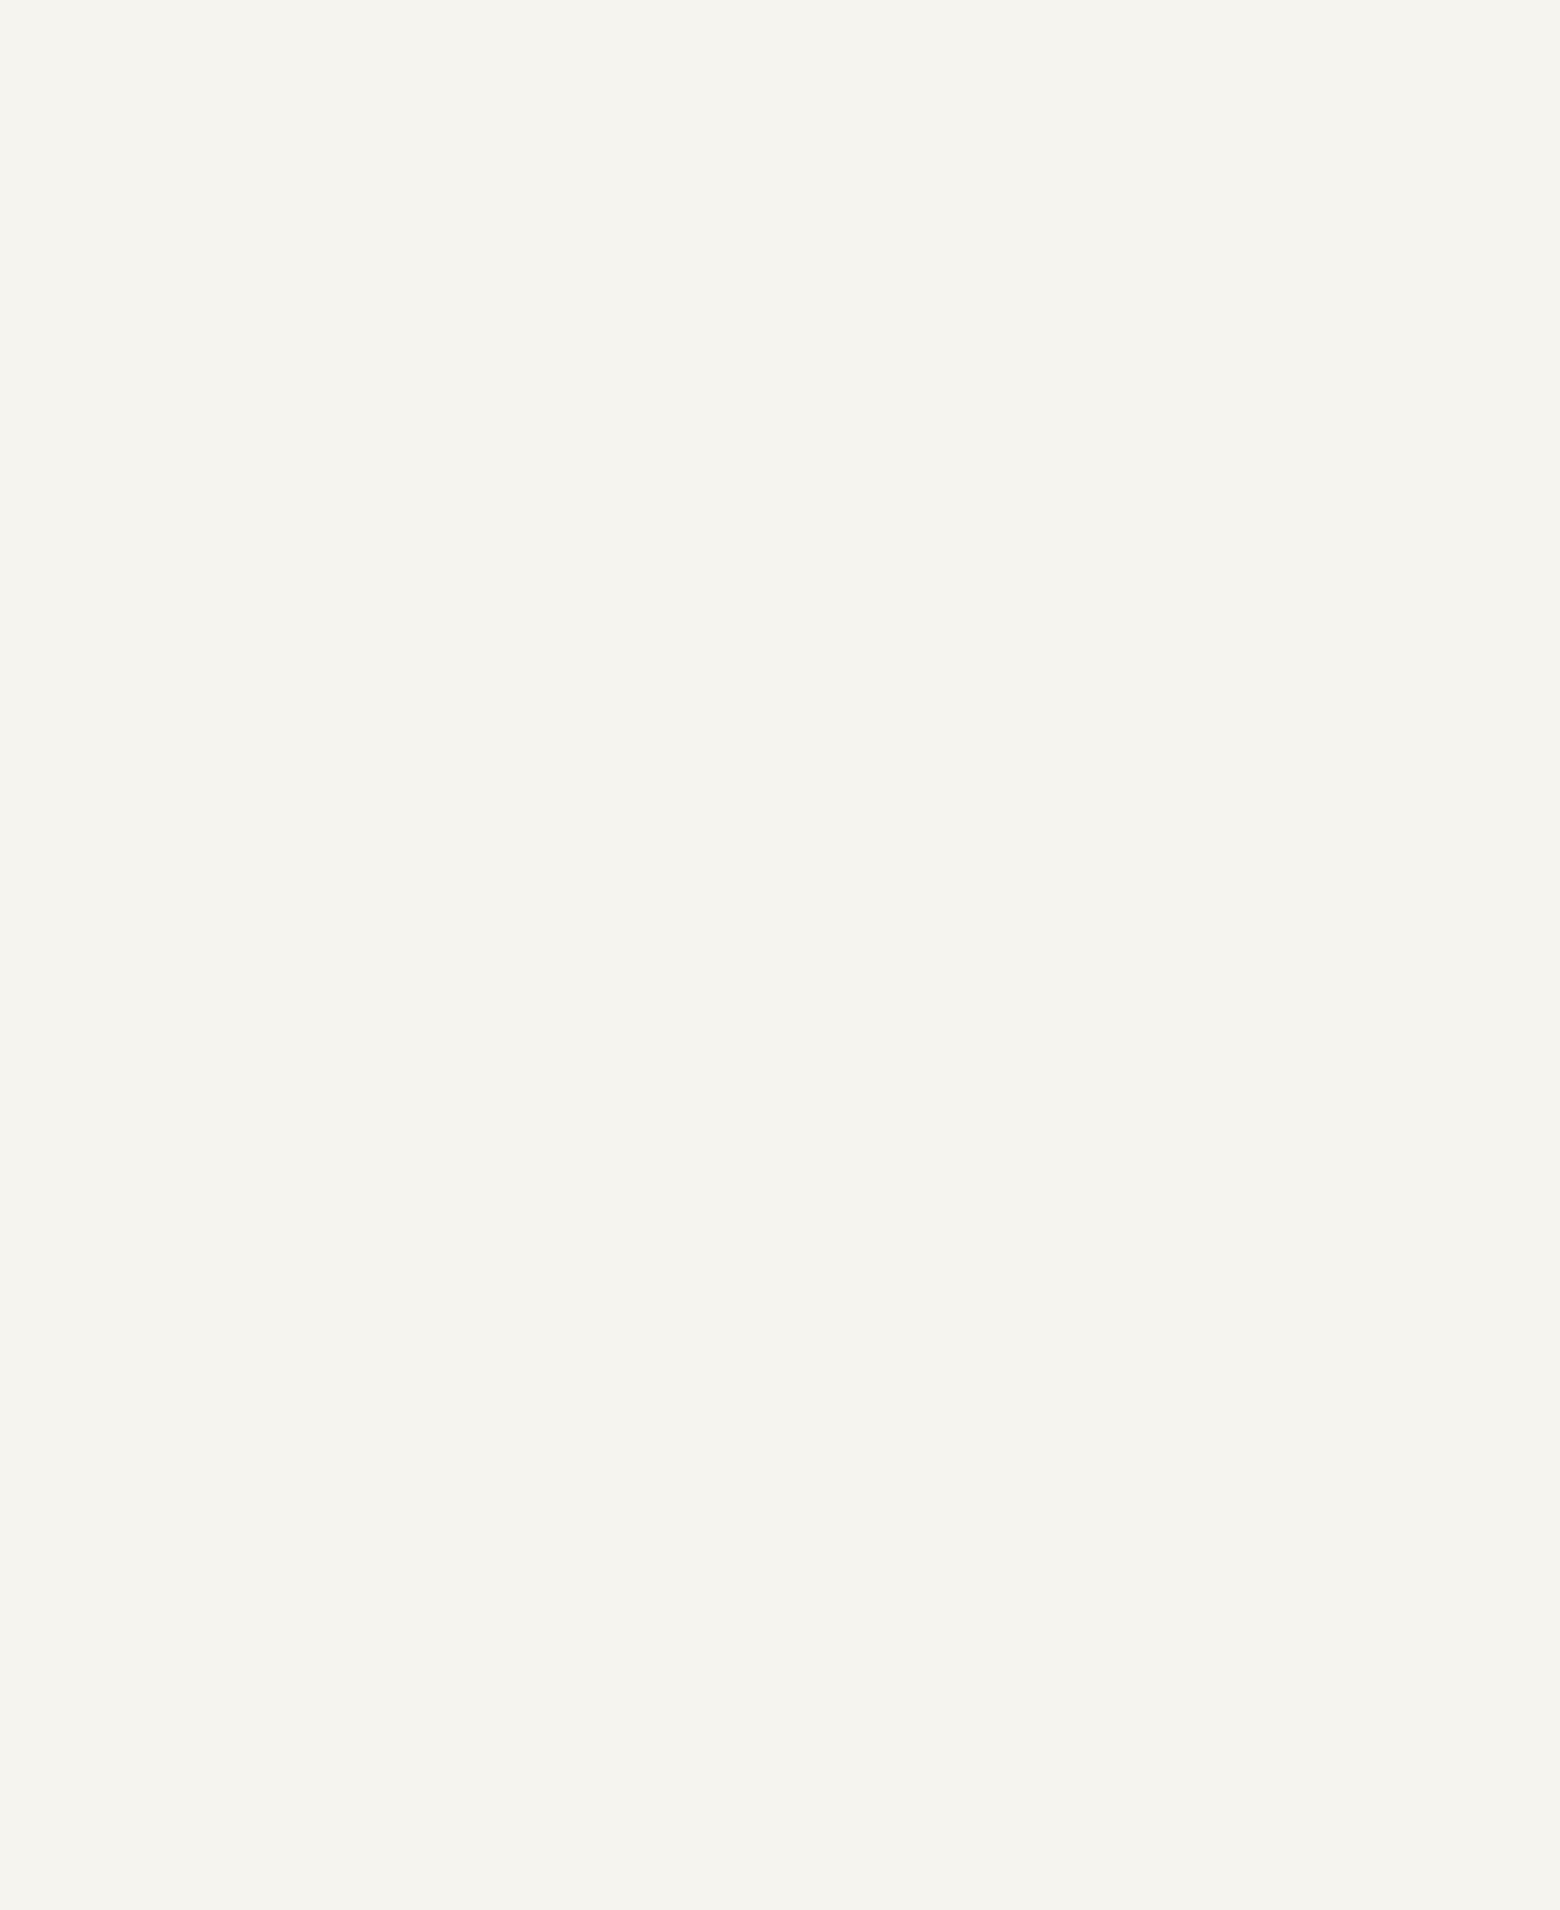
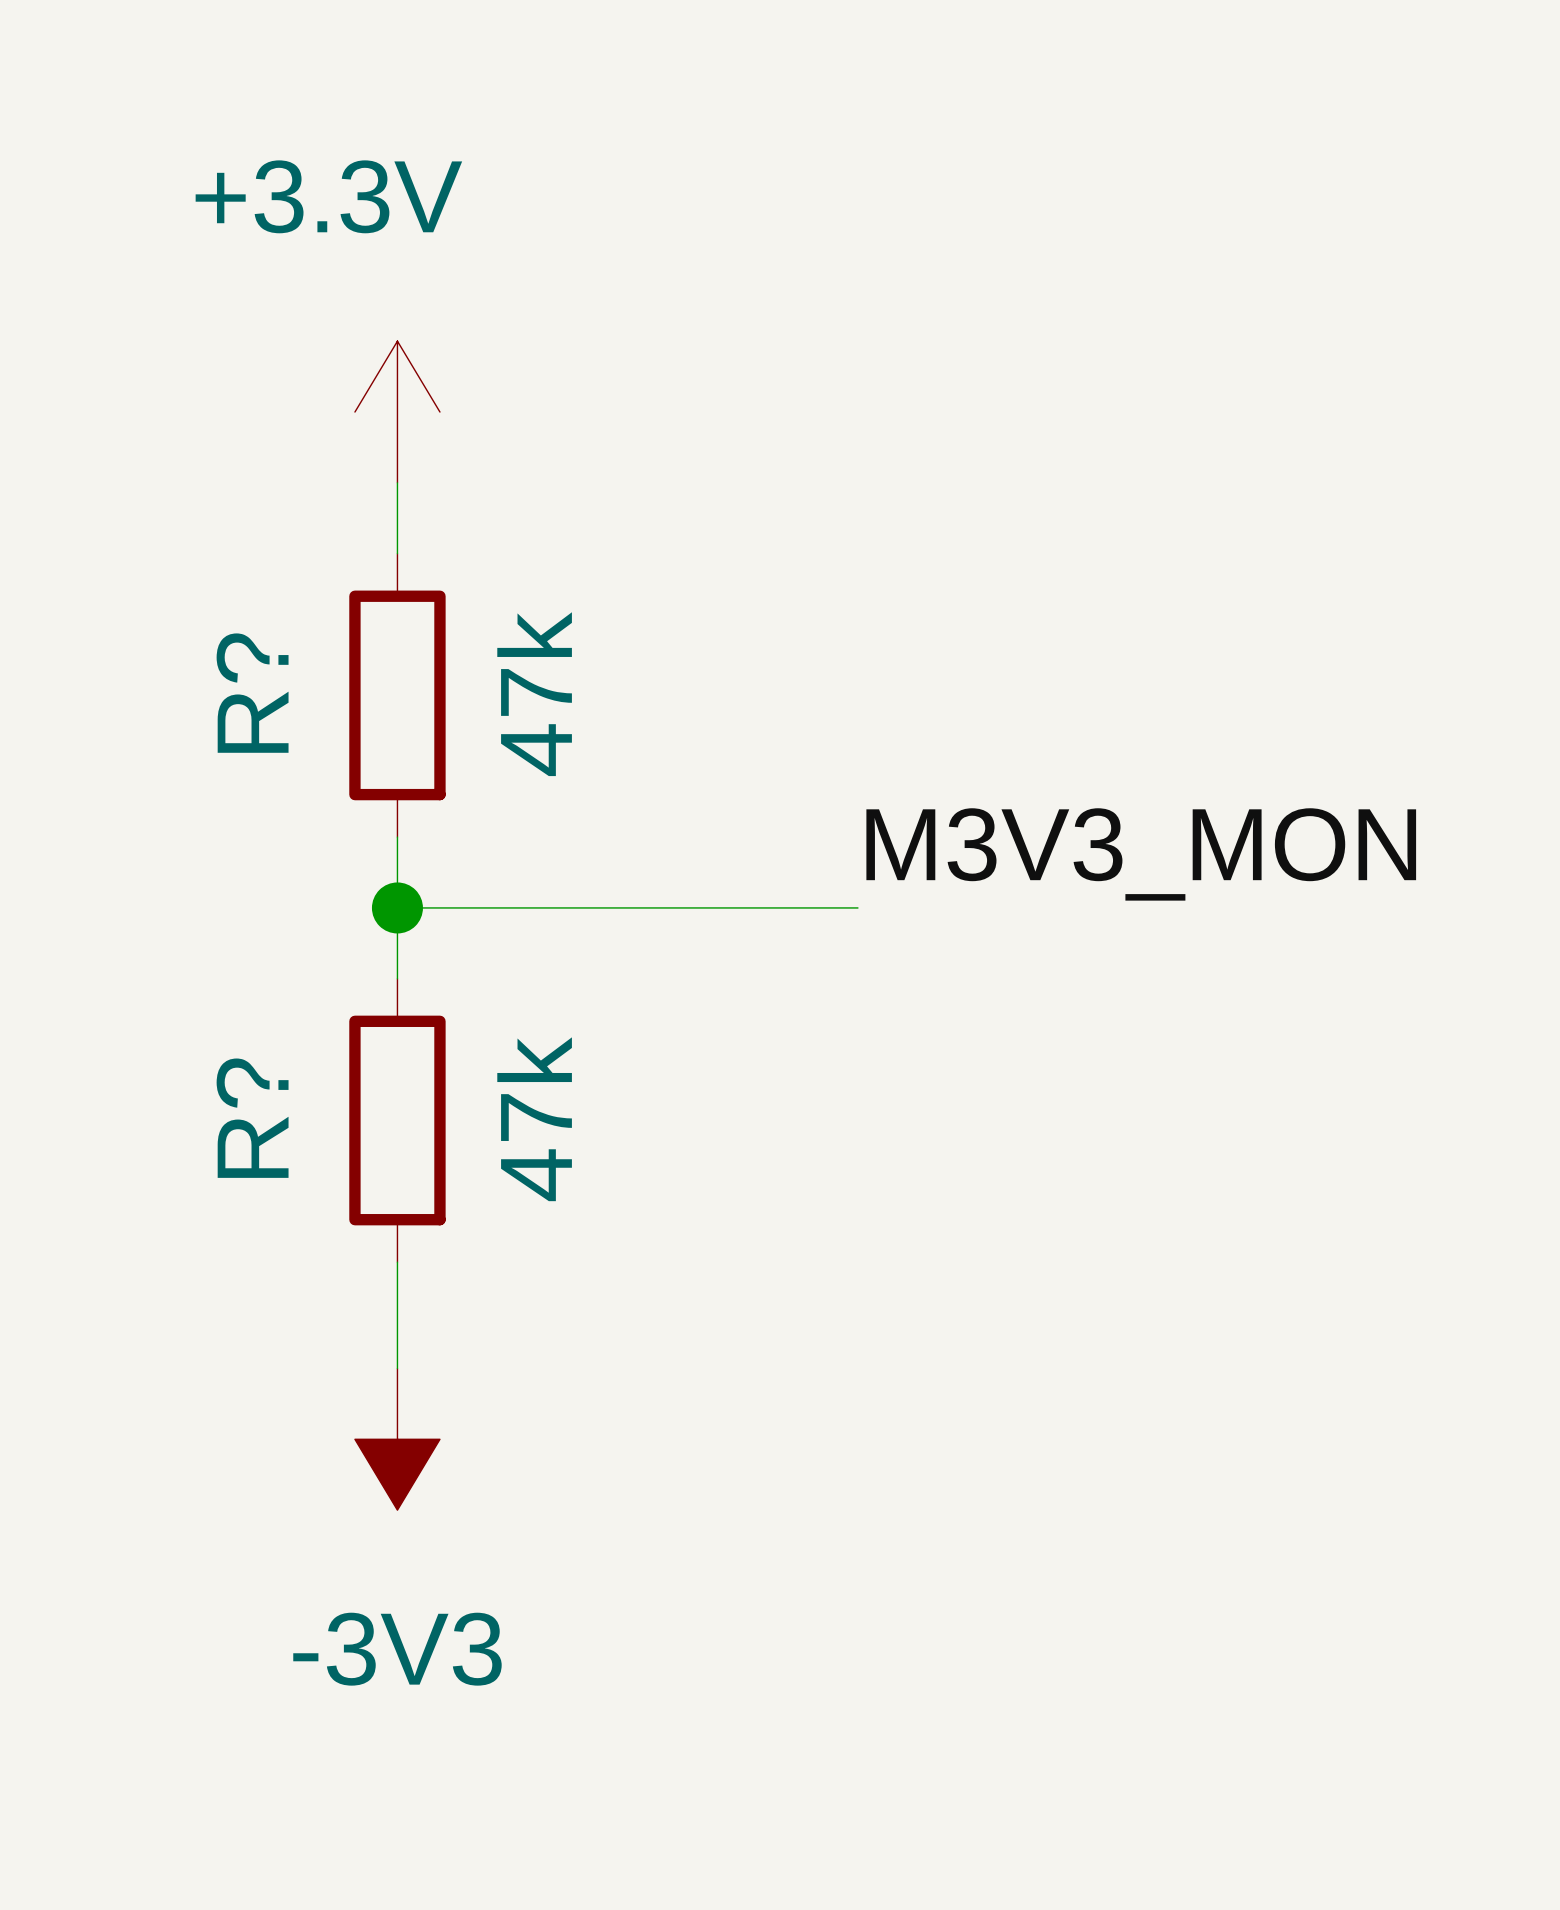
power symbol: none -> +3.3V (397, 412)
wire: none -> (397, 482) (397, 553)
R?: none -> 47k (397, 695)
wire: none -> (397, 837) (397, 978)
label: none -> M3V3_MON (1141, 854)
wire: none -> (397, 907) (857, 907)
junction: none -> (397, 907)
R?: none -> 47k (397, 1120)
wire: none -> (397, 1262) (397, 1368)
power symbol: none -> -3V3 (397, 1439)

